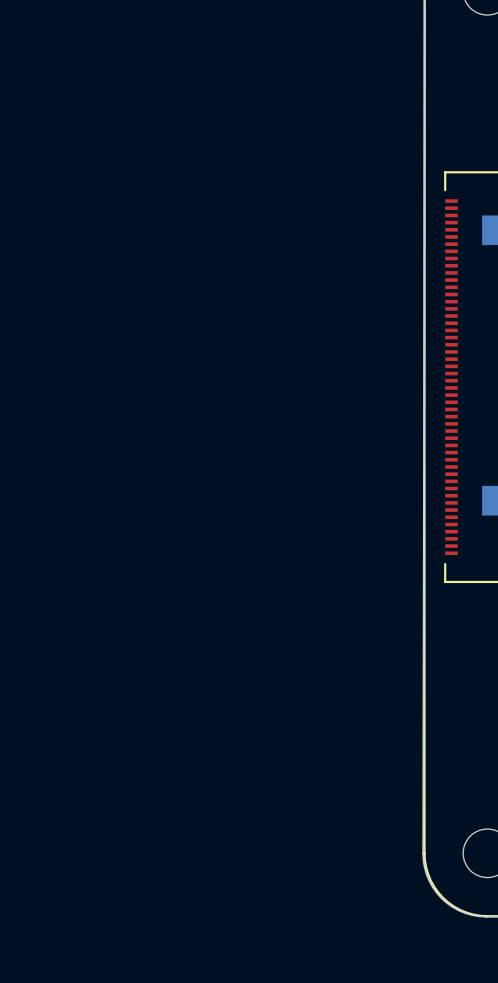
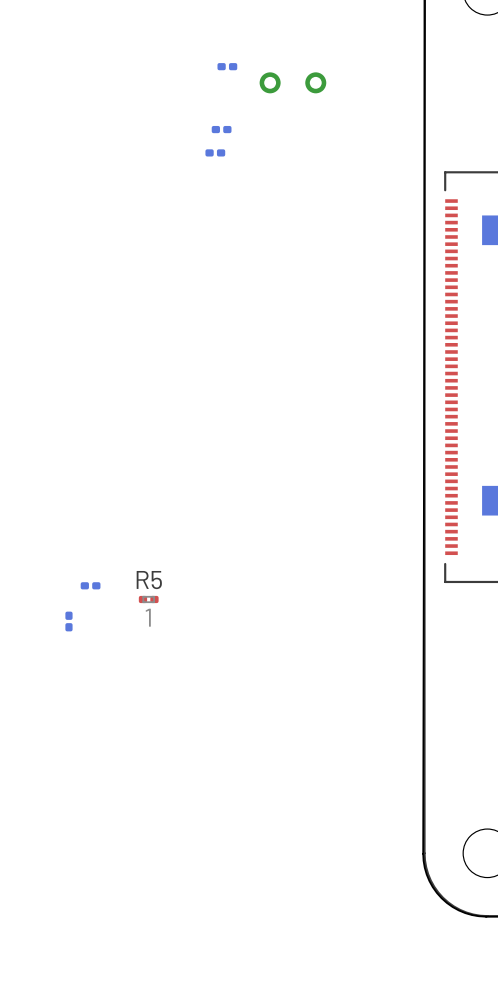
part: none -> (227, 66)
part: none -> (292, 82)
part: none -> (221, 129)
part: none -> (215, 152)
part: none -> (90, 585)
R5: none -> 1 (148, 599)
part: none -> (68, 621)

